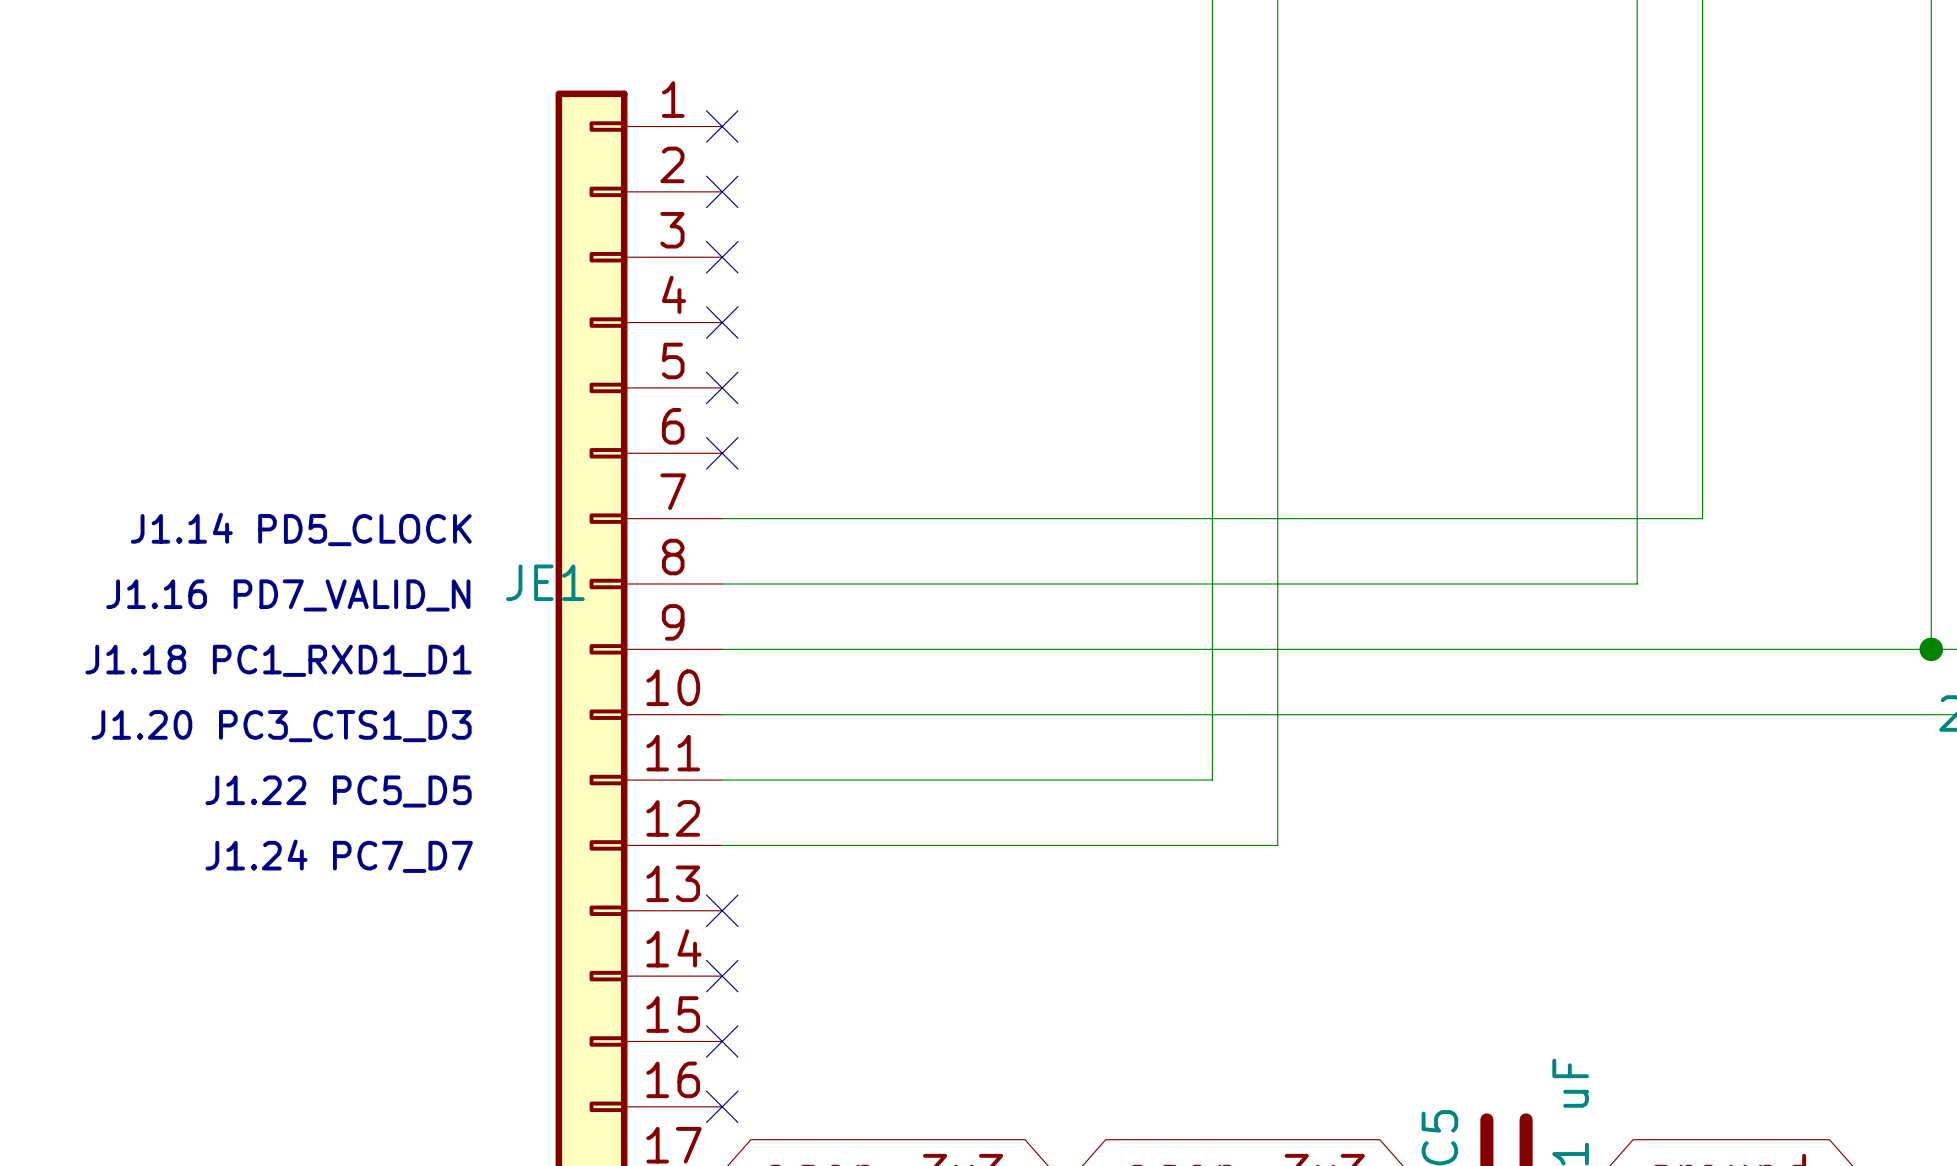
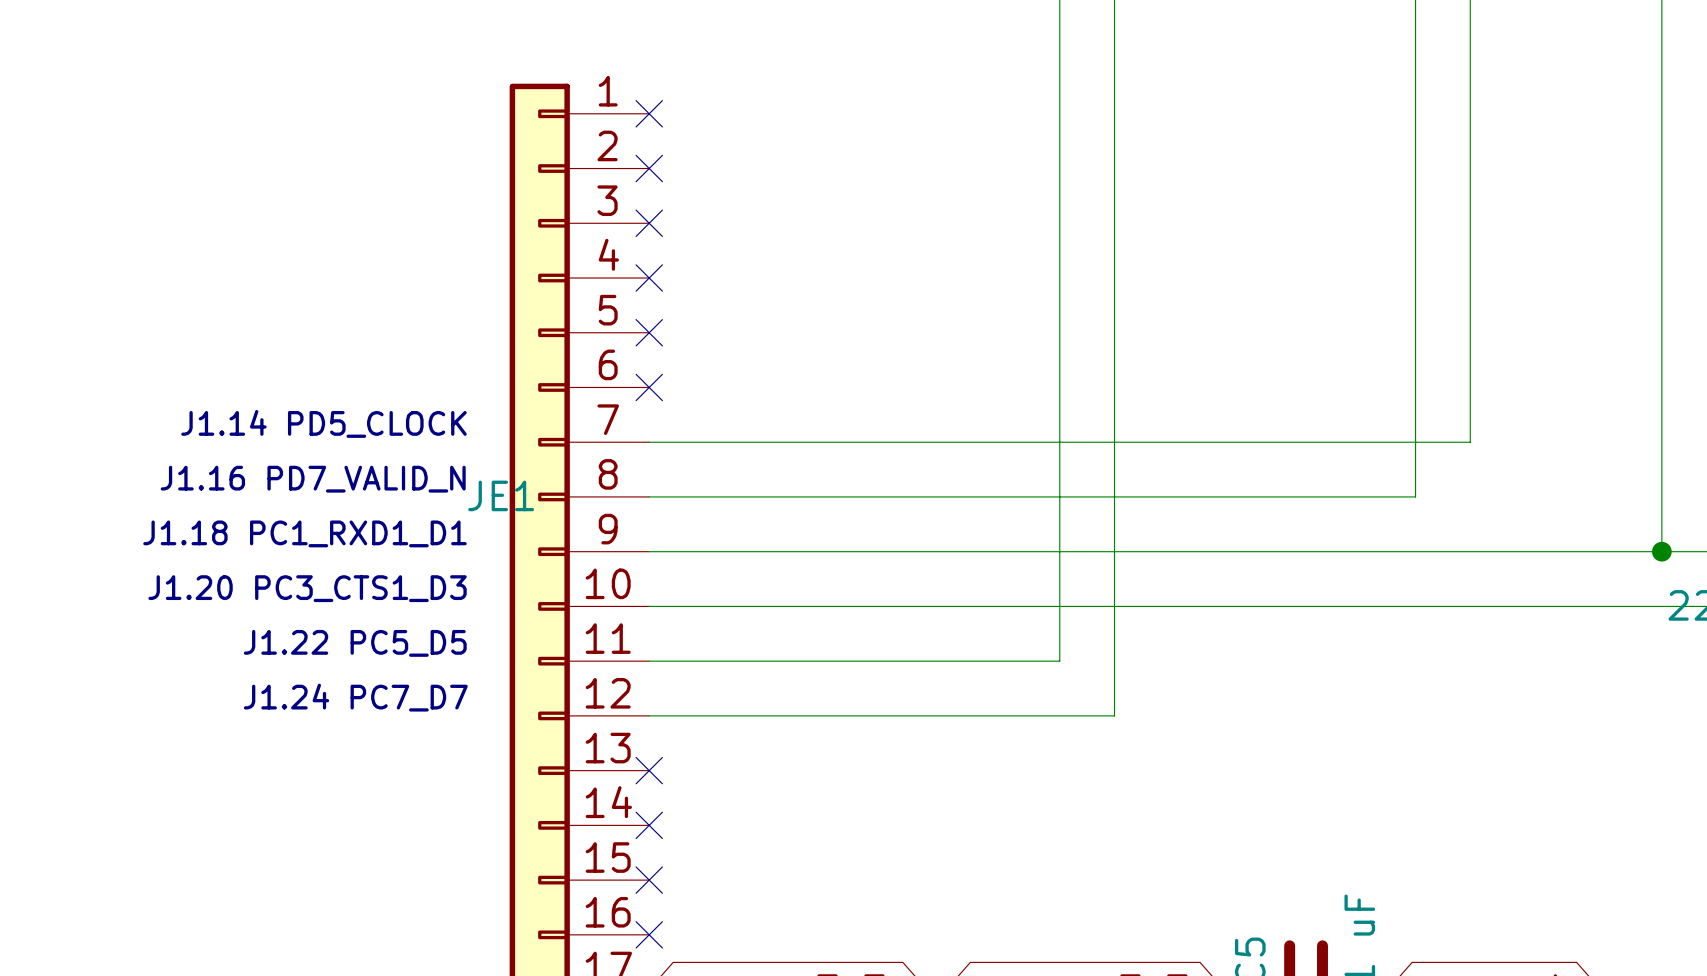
text position: J1.14 PD5_CLOCK (301, 529) -> J1.14 PD5_CLOCK (323, 423)
text position: J1.16 PD7_VALID_N (288, 595) -> J1.16 PD7_VALID_N (313, 479)
text position: J1.18 PC1_RXD1_D1 (278, 660) -> J1.18 PC1_RXD1_D1 (304, 533)
text position: J1.20 PC3_CTS1_D3 (281, 726) -> J1.20 PC3_CTS1_D3 (307, 588)
text position: J1.22 PC5_D5 (338, 791) -> J1.22 PC5_D5 (355, 643)
text position: J1.24 PC7_D7 (339, 856) -> J1.24 PC7_D7 (355, 697)

